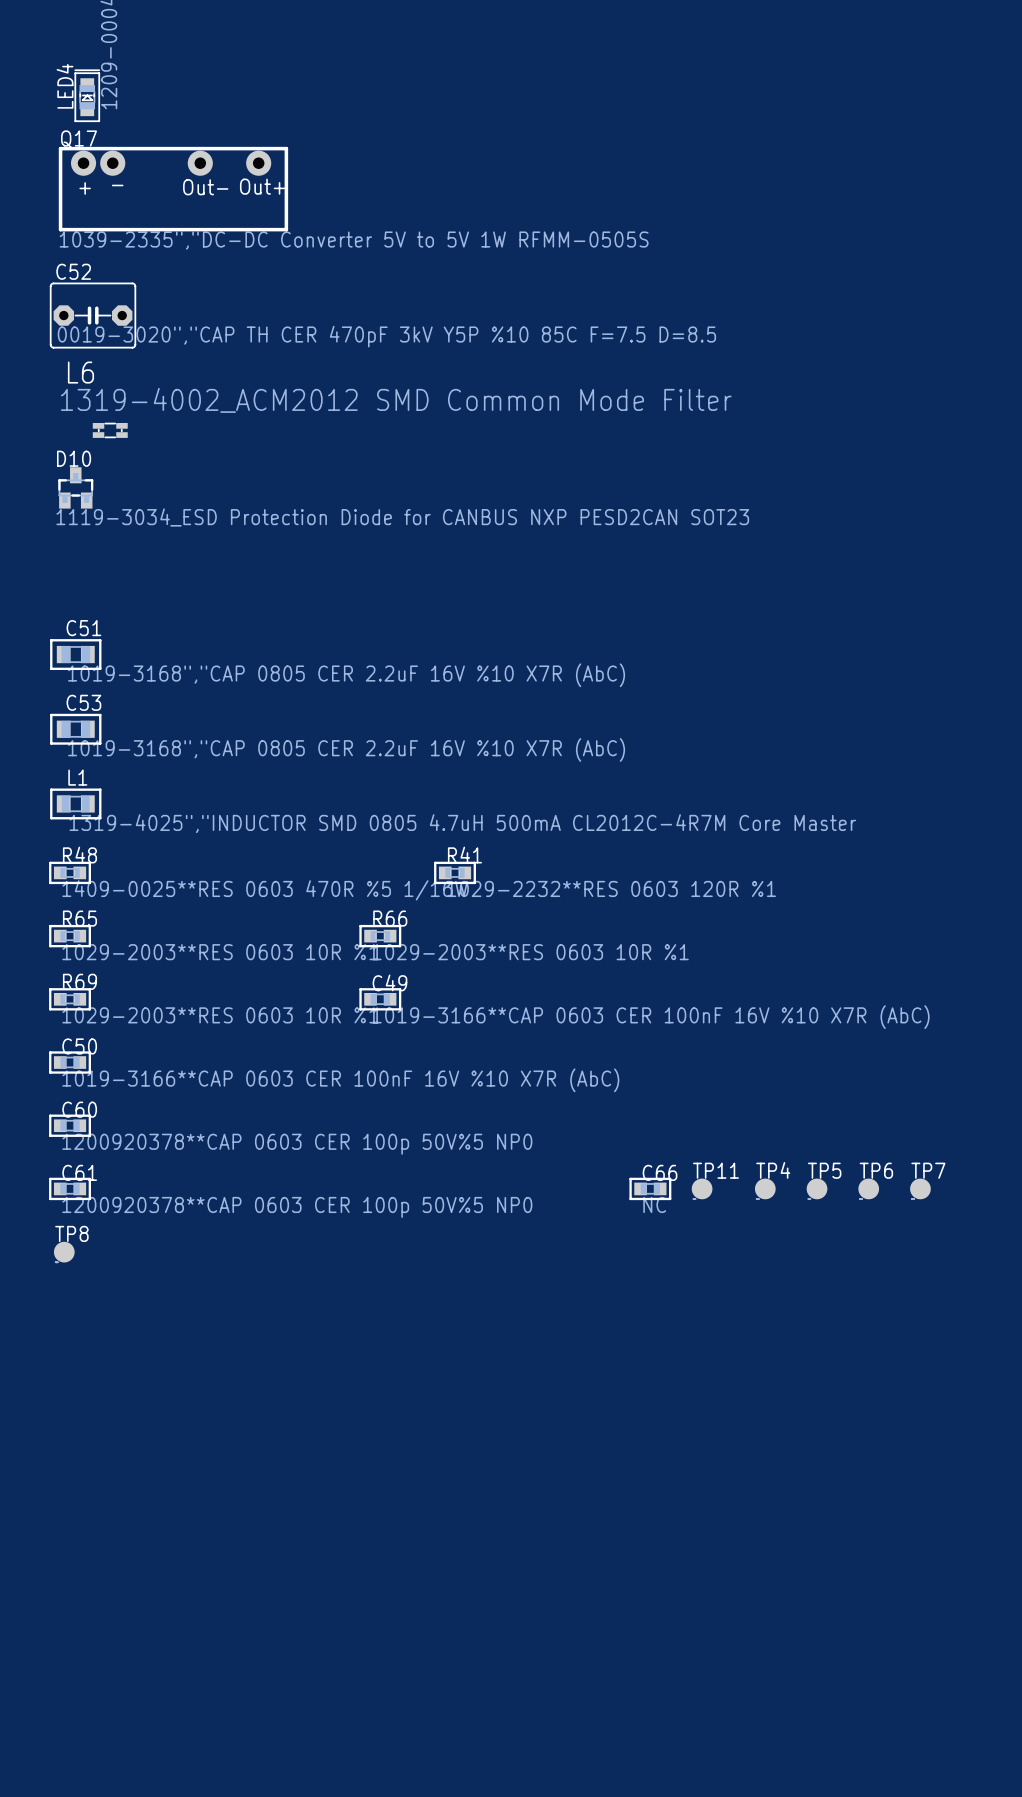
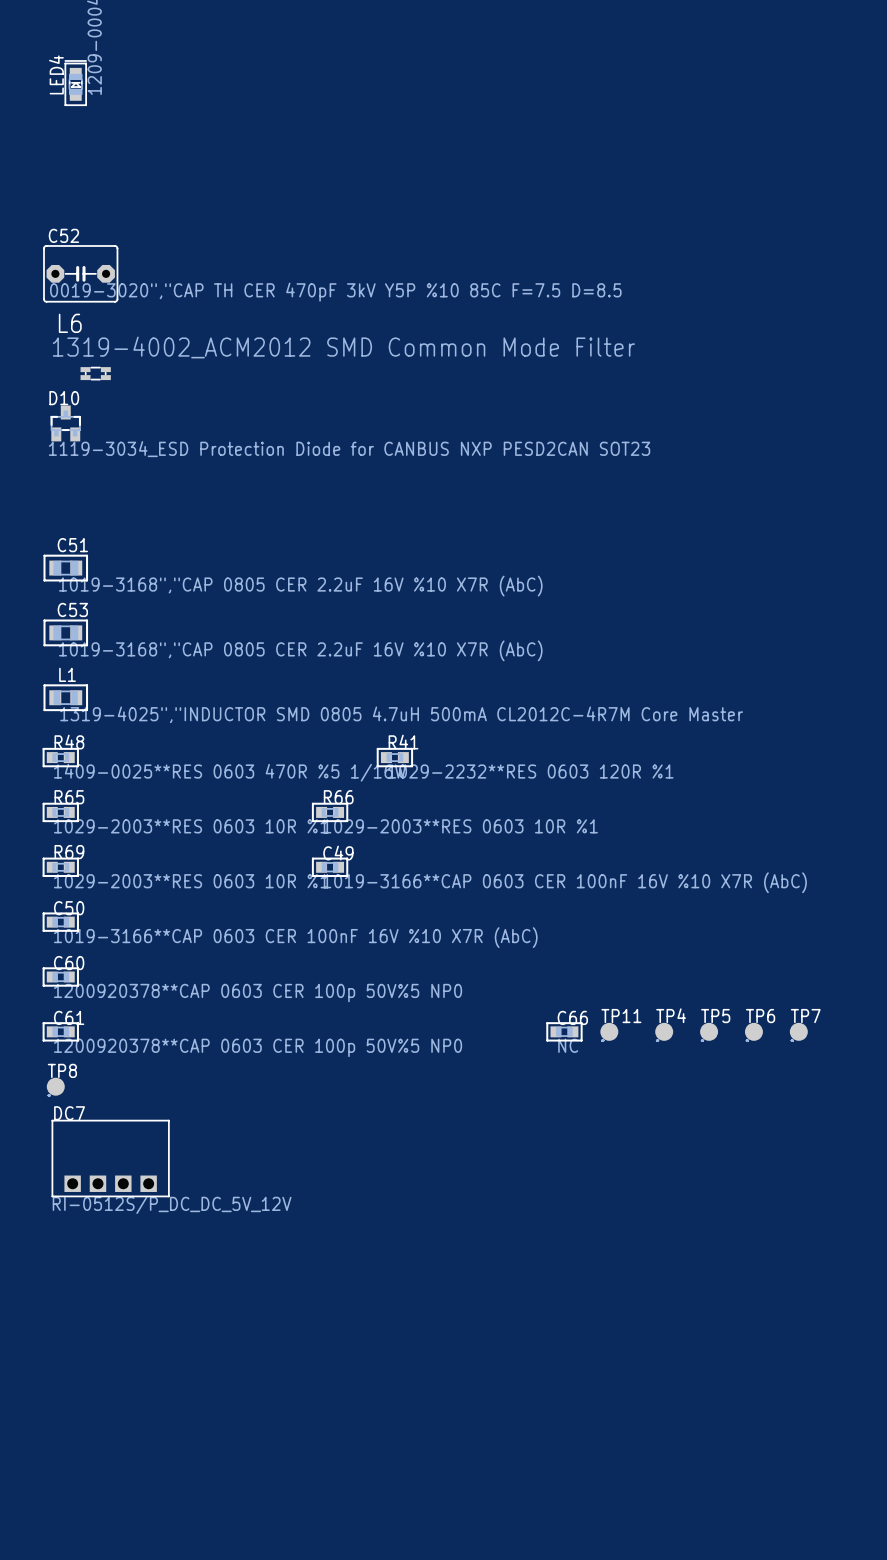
Q17: 1039-2335","DC-DC Converter 5V to 5V 1W RFMM-0505S (173, 189) -> none
DC7: none -> RI-0512S/P_DC_DC_5V_12V (110, 1158)

